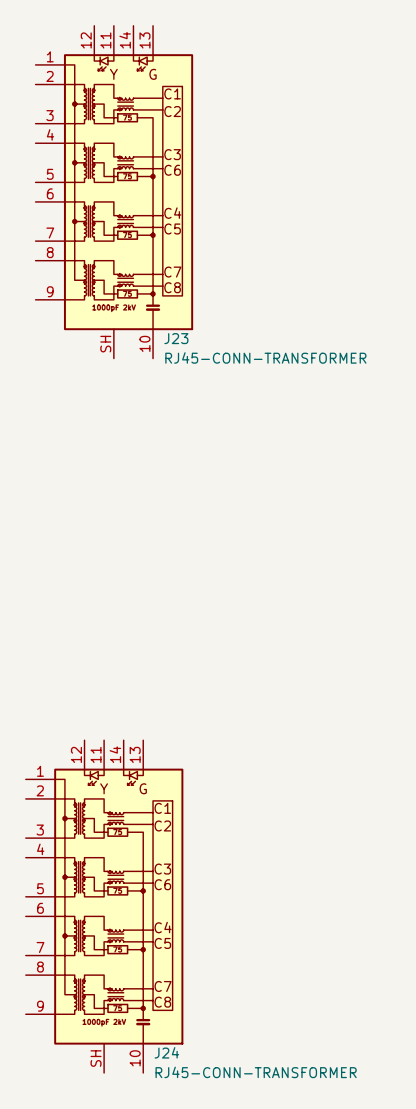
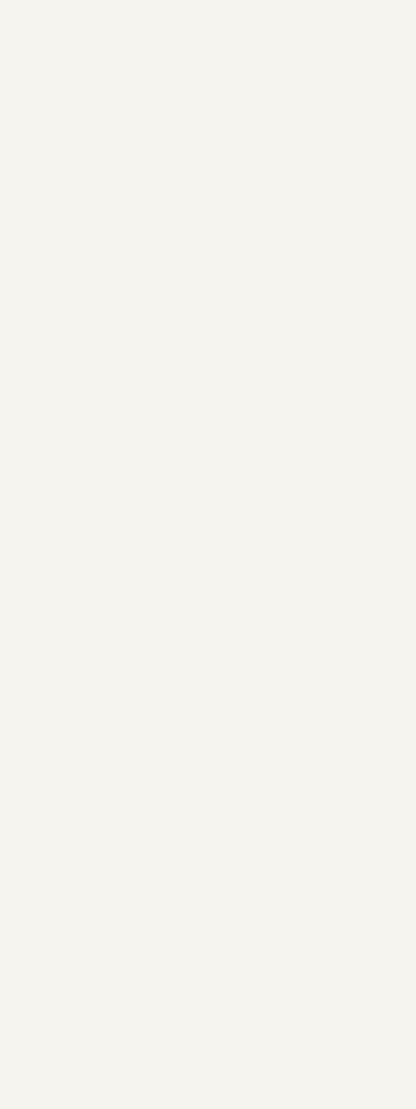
J23: RJ45-CONN-TRANSFORMER (114, 192) -> none
J24: RJ45-CONN-TRANSFORMER (104, 906) -> none

